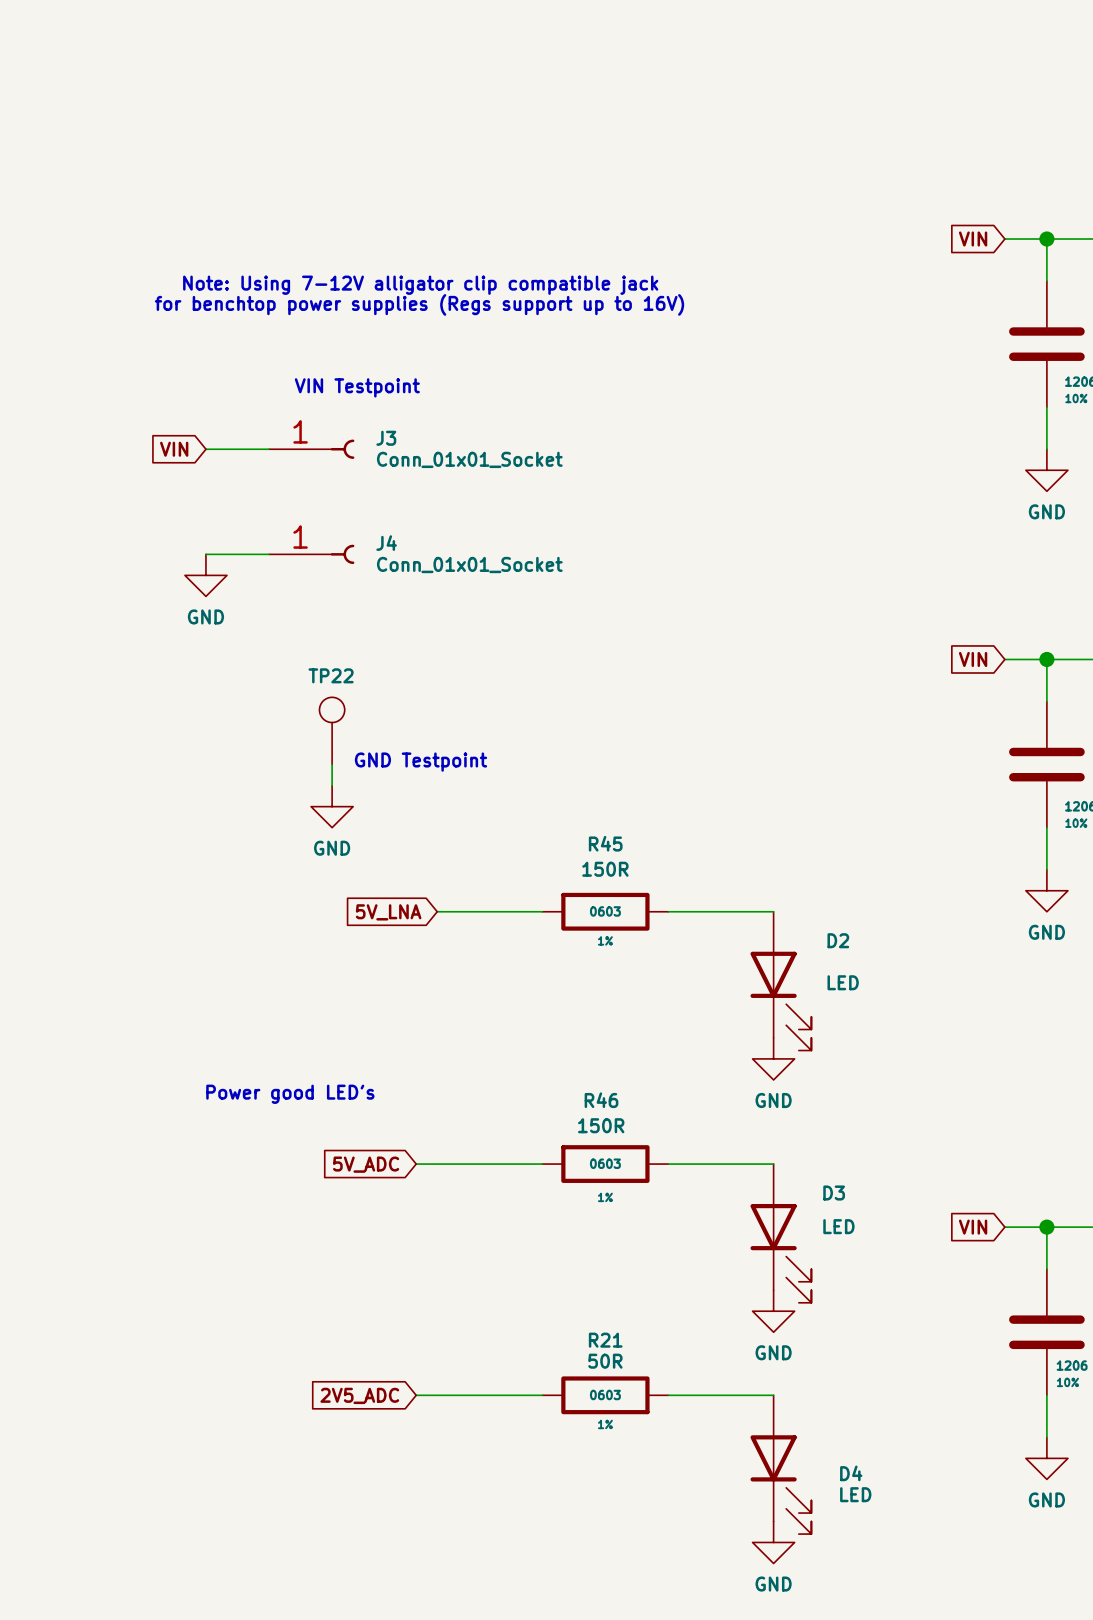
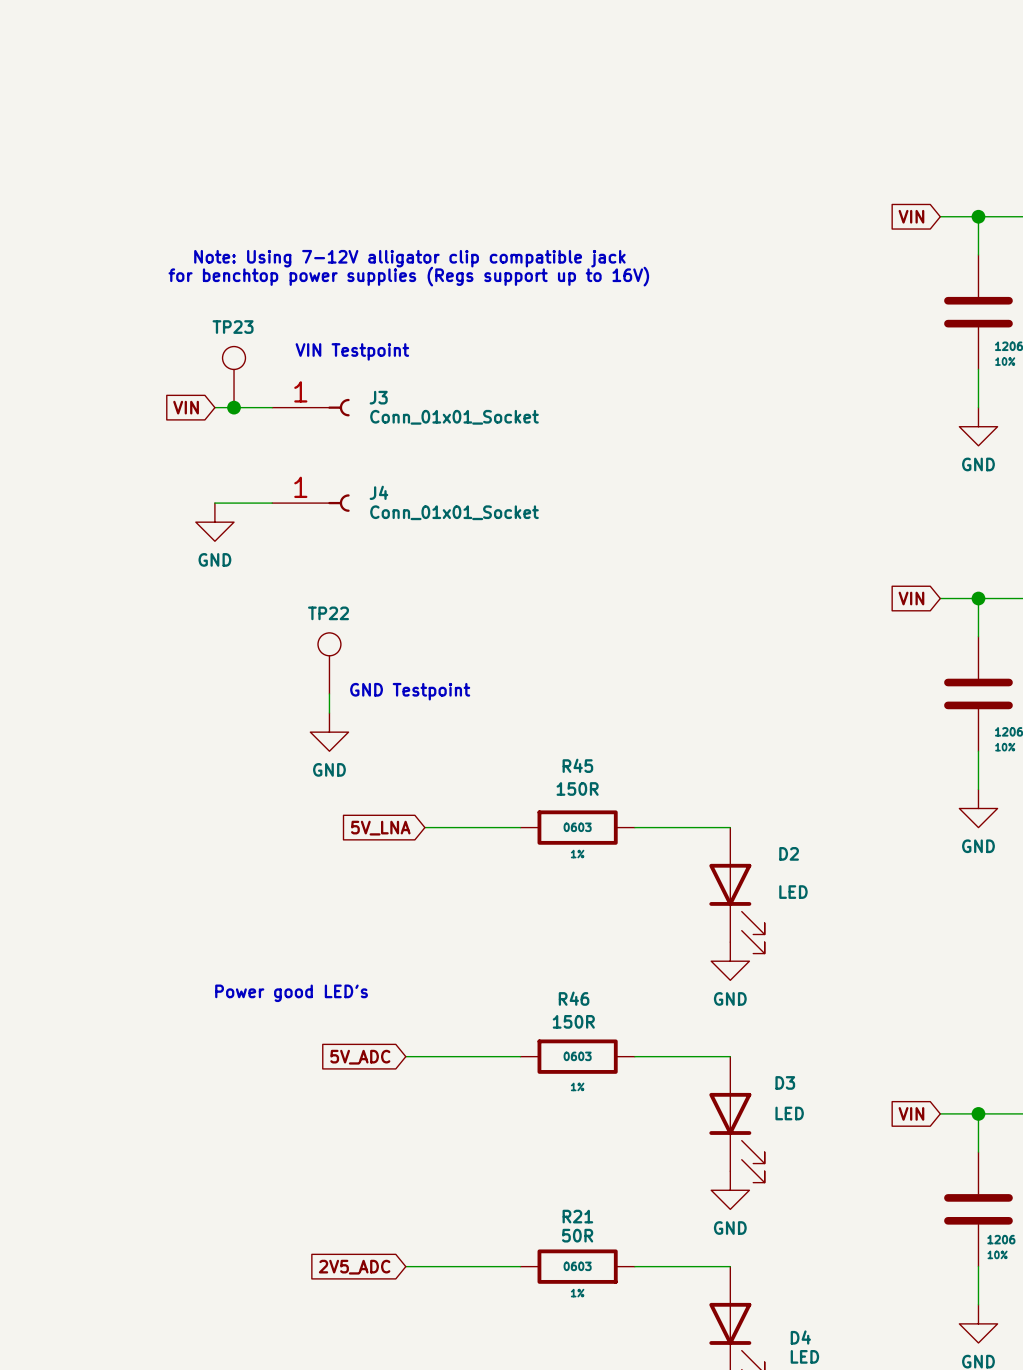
TP23: none -> (234, 377)
junction: none -> (234, 407)

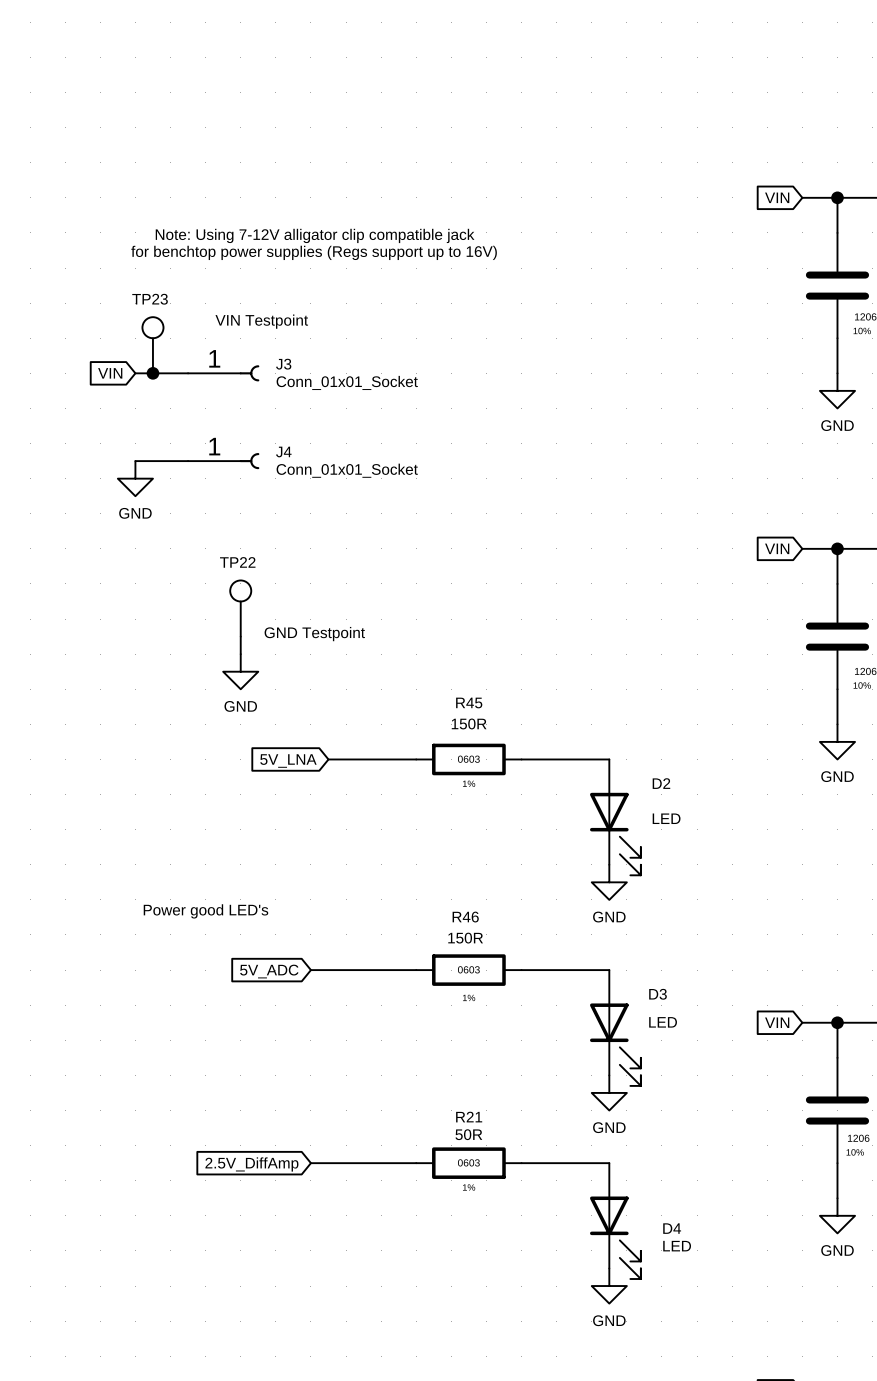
global label: 2V5_ADC (354, 1267) -> 2.5V_DiffAmp (251, 1164)

